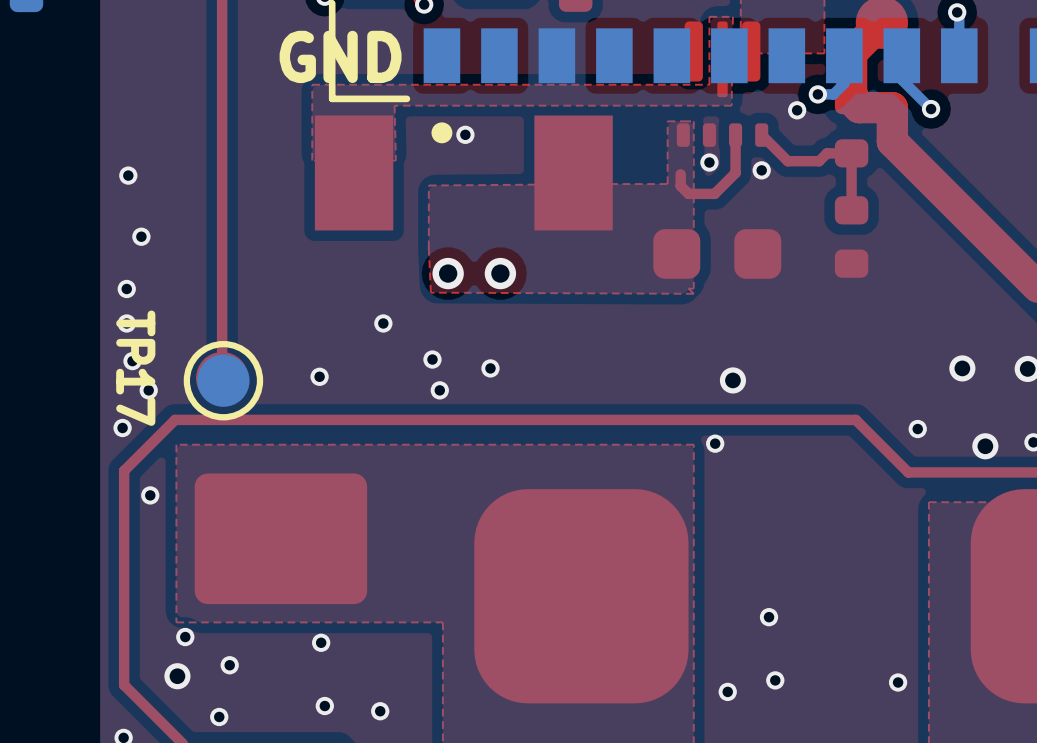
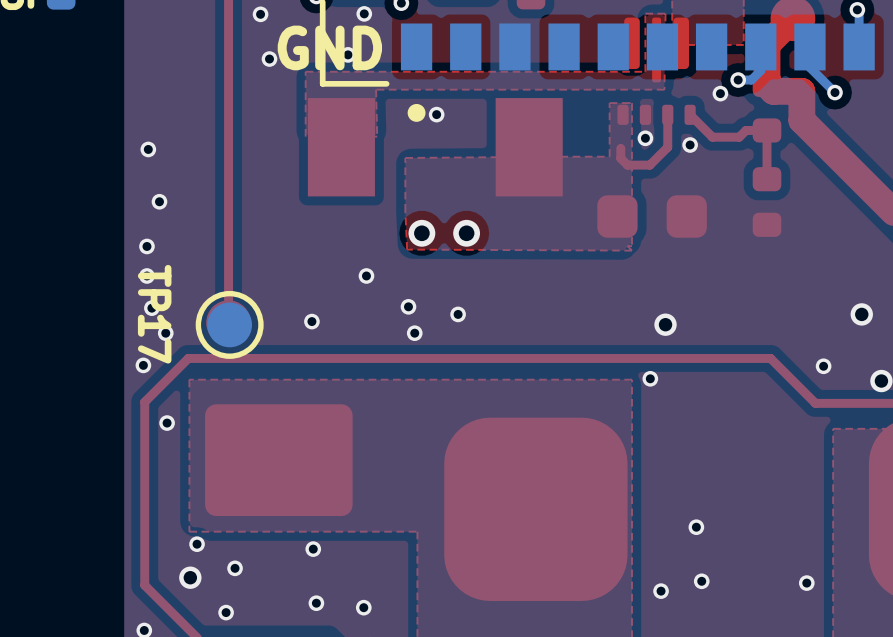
via: none -> (260, 14)
via: none -> (364, 13)
via: none -> (348, 54)
via: none -> (269, 59)

